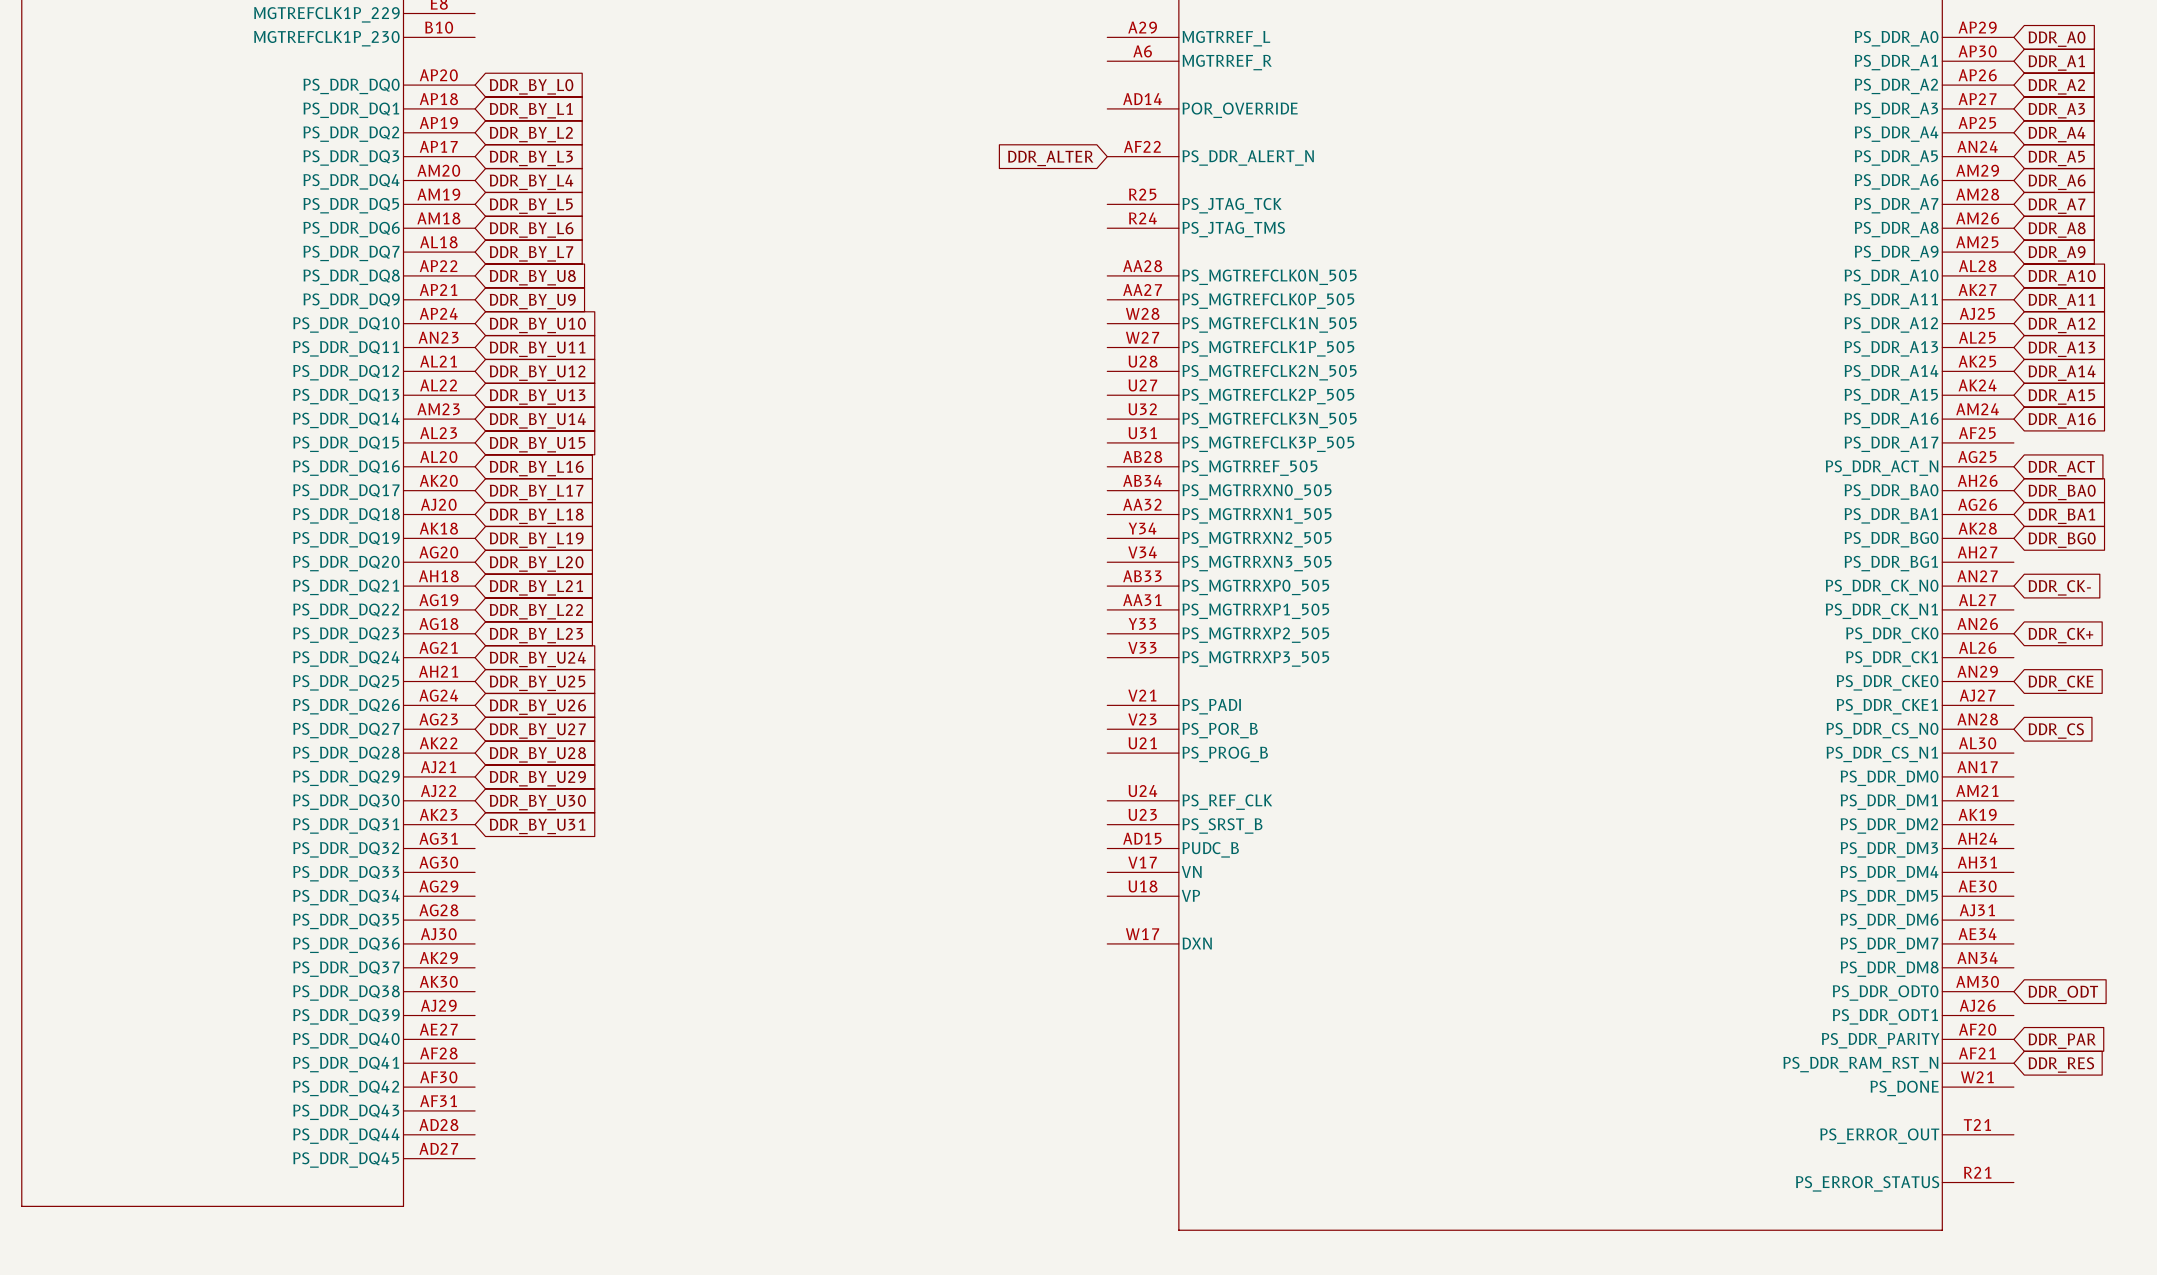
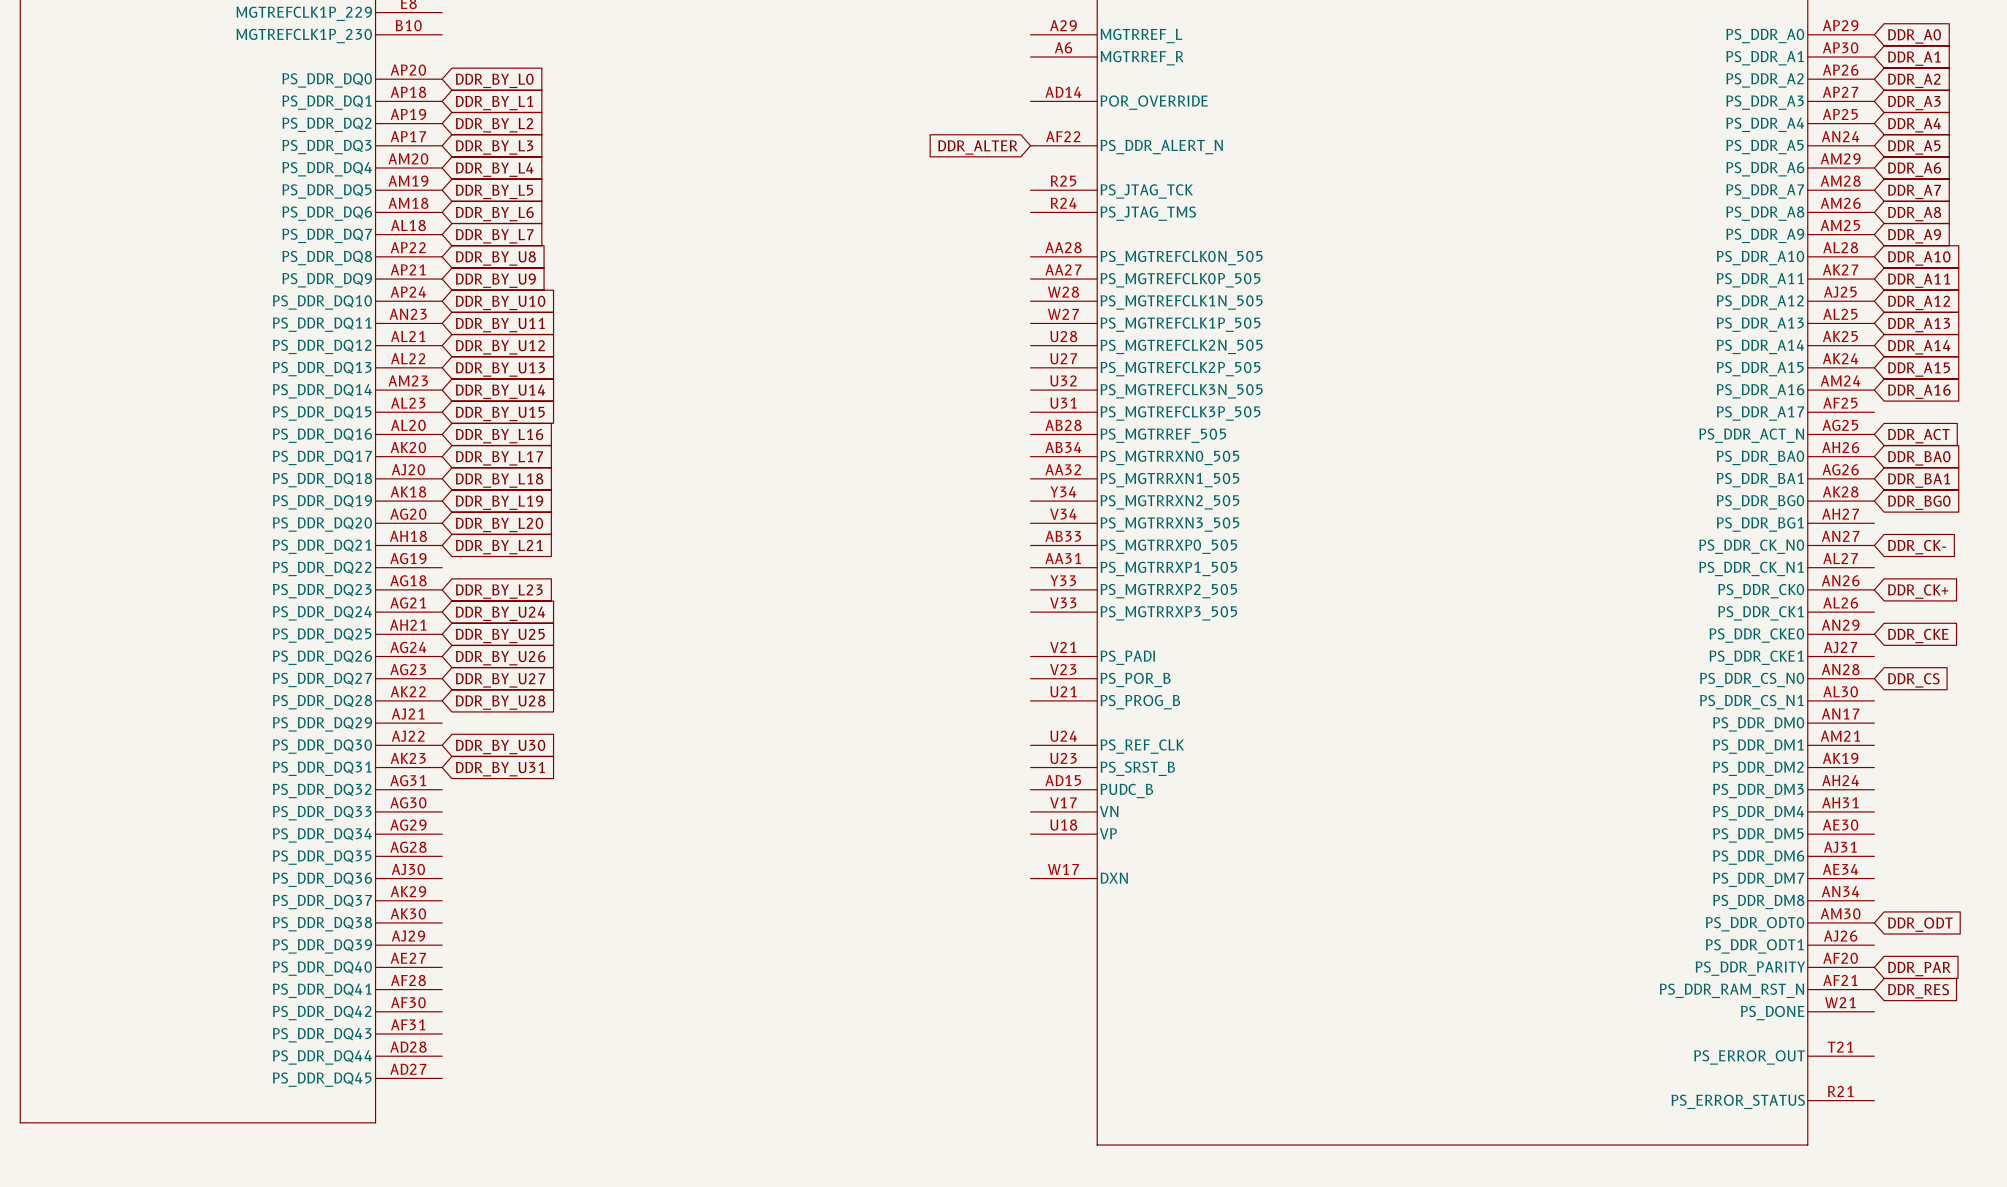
global label: DDR_BY_L22 (536, 611) -> none
global label: DDR_BY_U29 (537, 778) -> none

